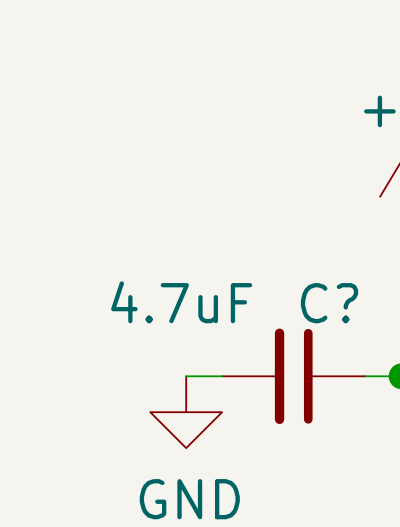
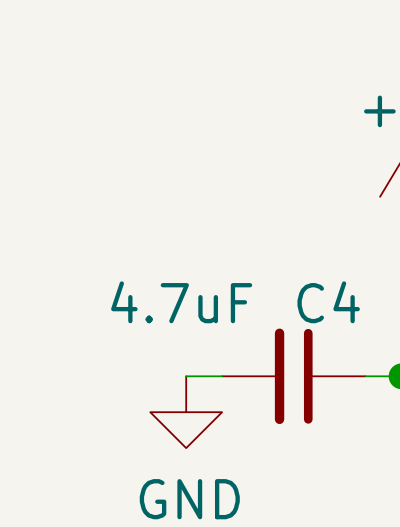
C? name: C? (329, 303) -> C4 (328, 302)

